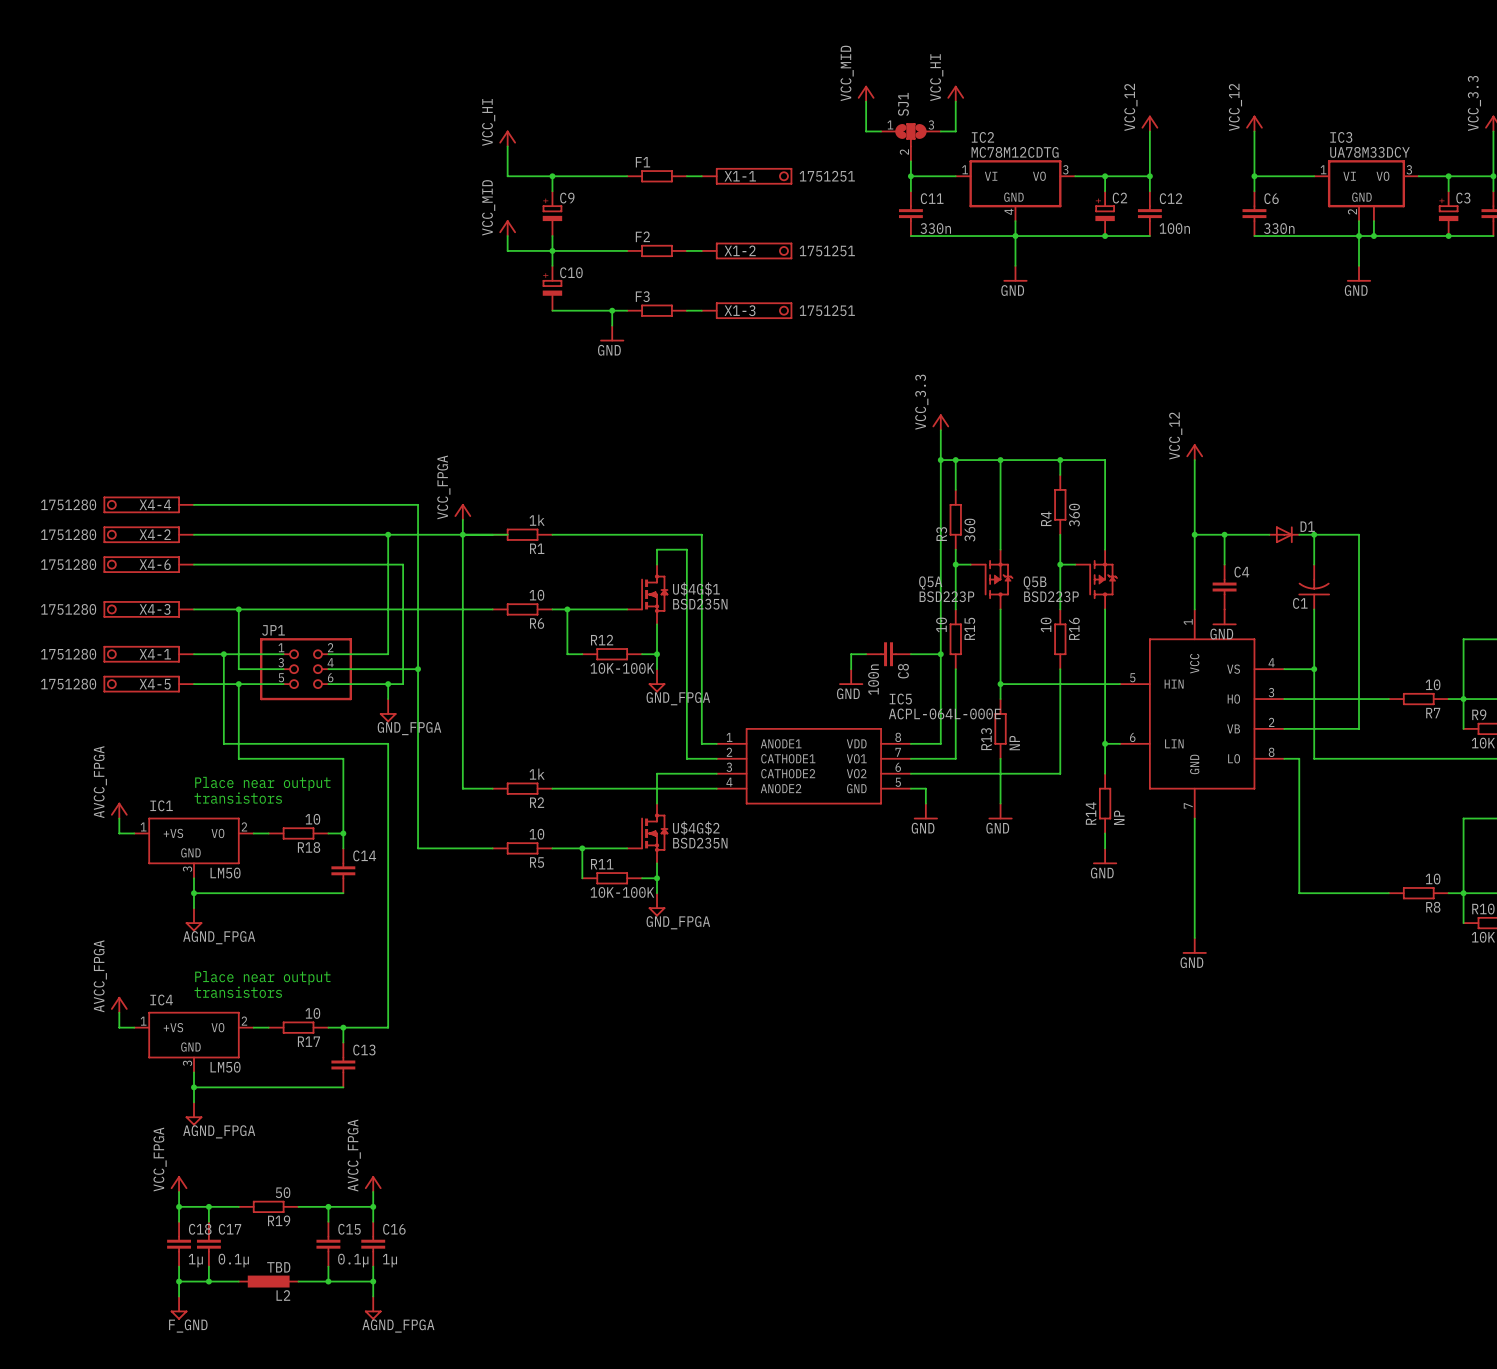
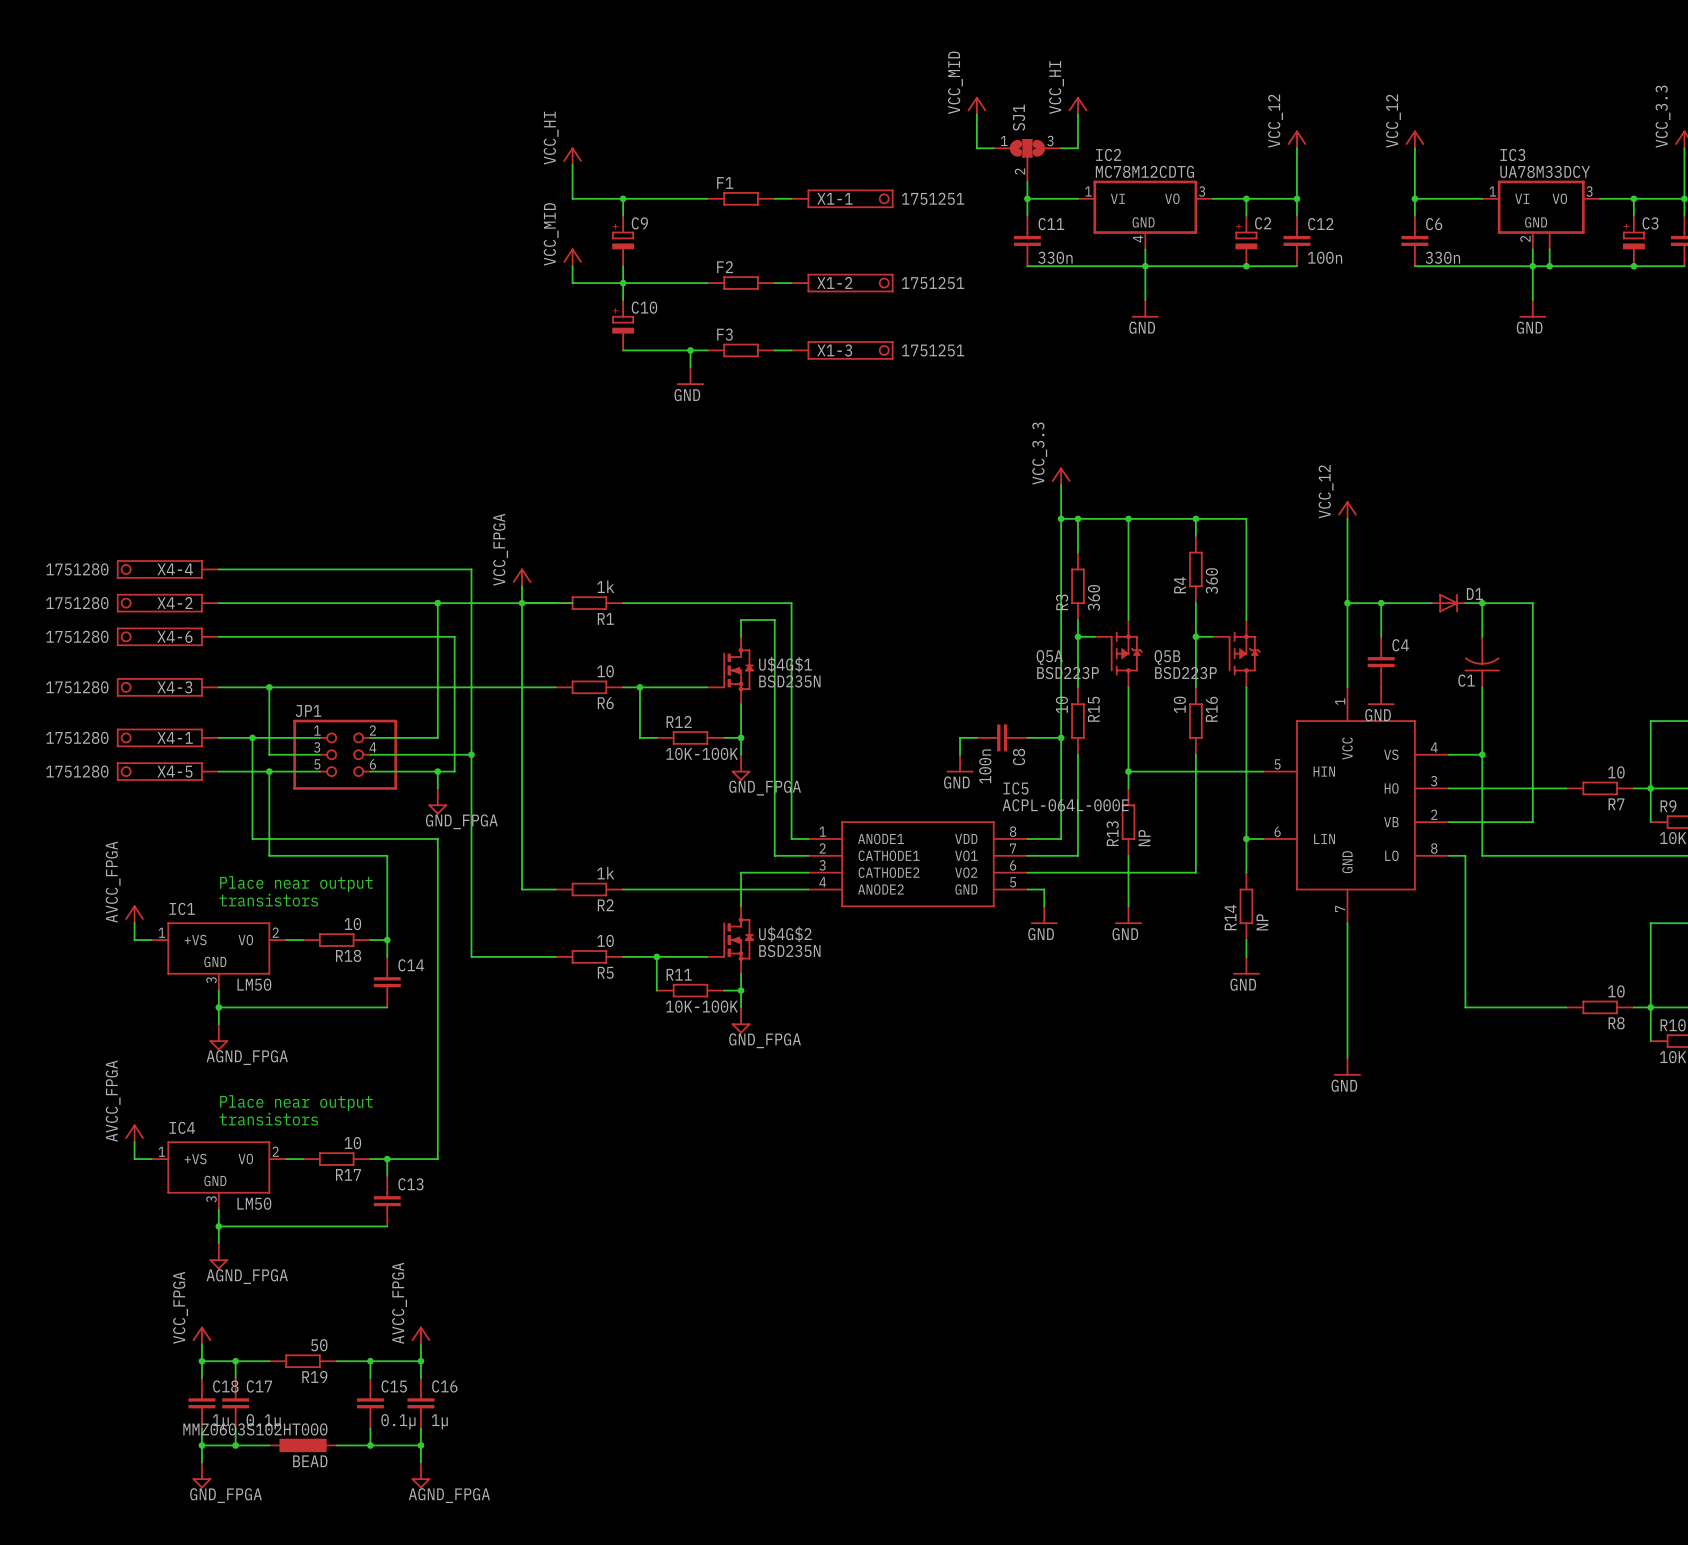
L2 value: TBD (278, 1267) -> MMZ0603S102HT000 (255, 1429)
L2 name: L2 (283, 1295) -> BEAD (310, 1461)
power symbol: F_GND (179, 1308) -> GND_FPGA (201, 1475)

